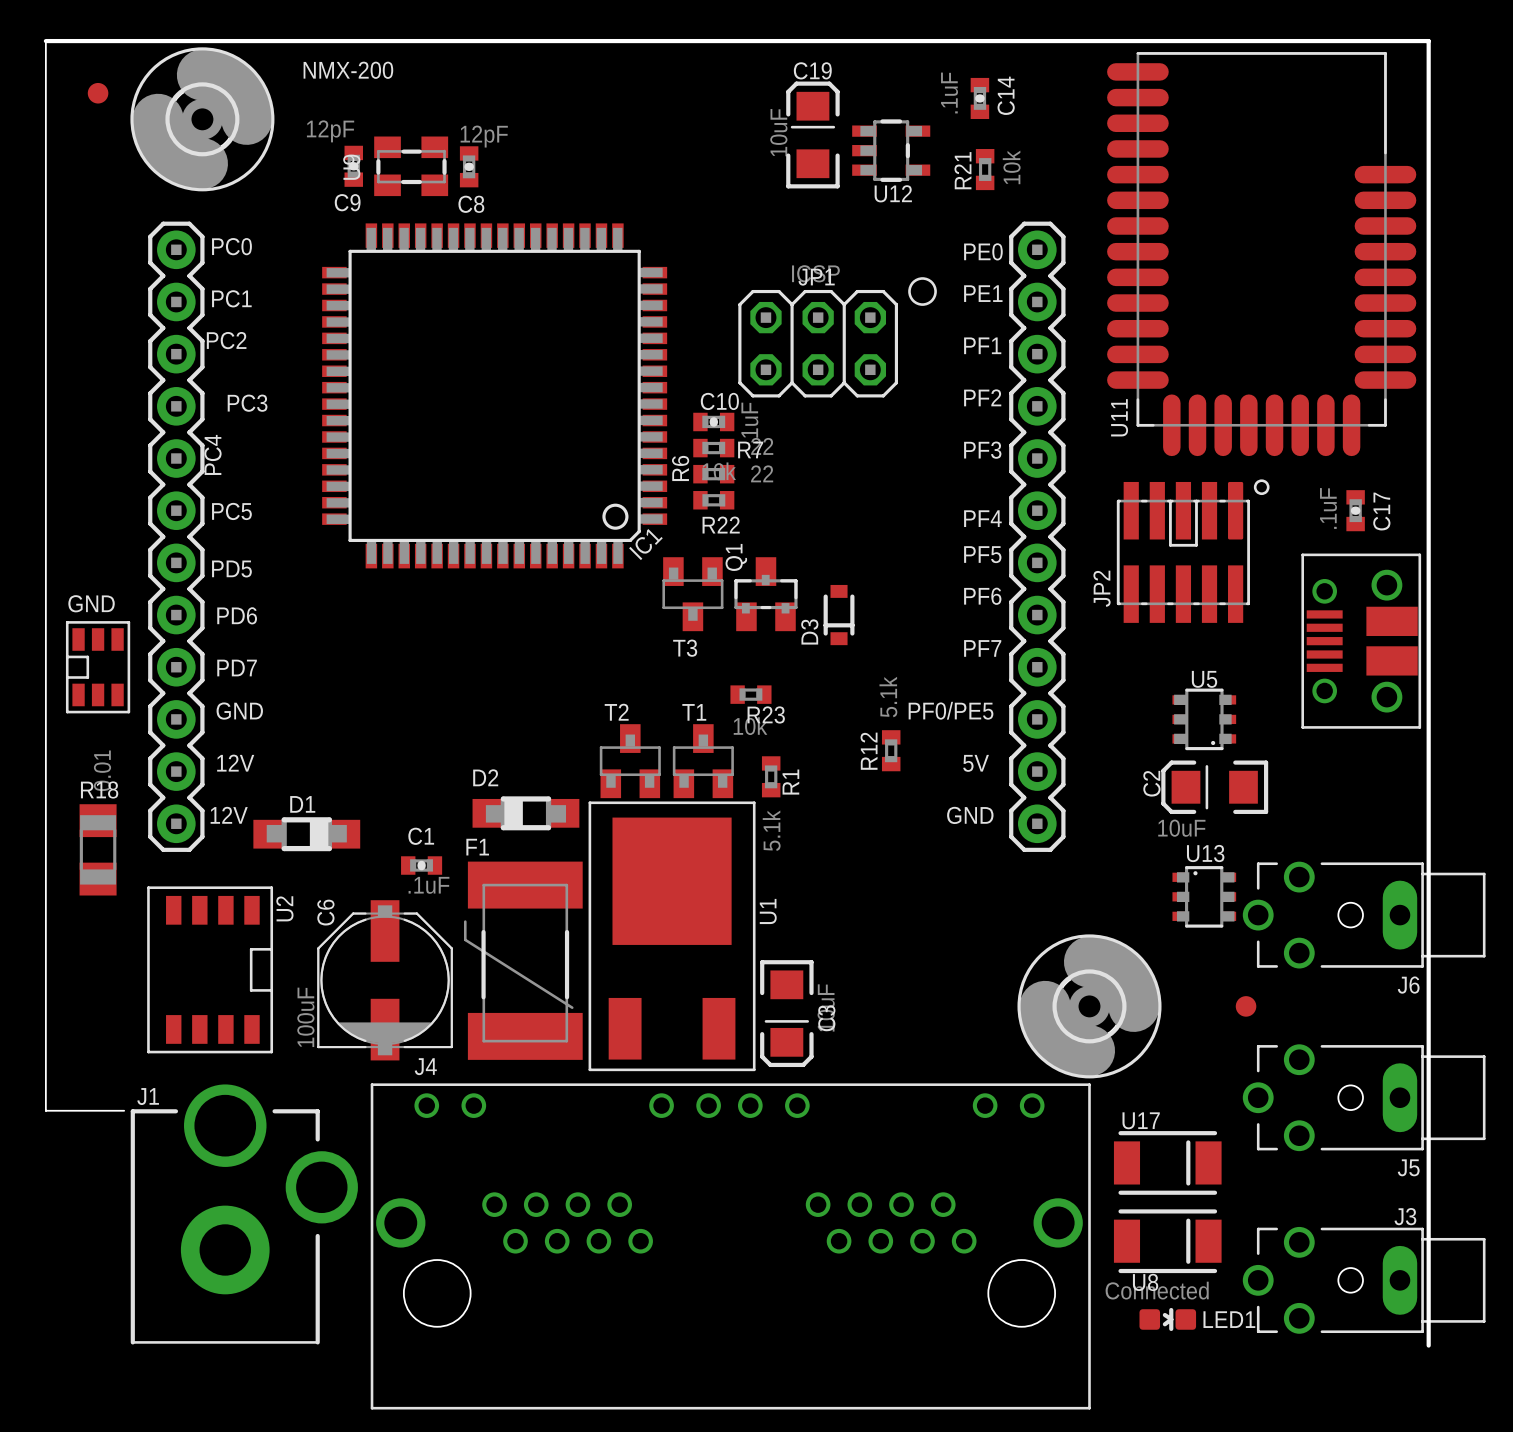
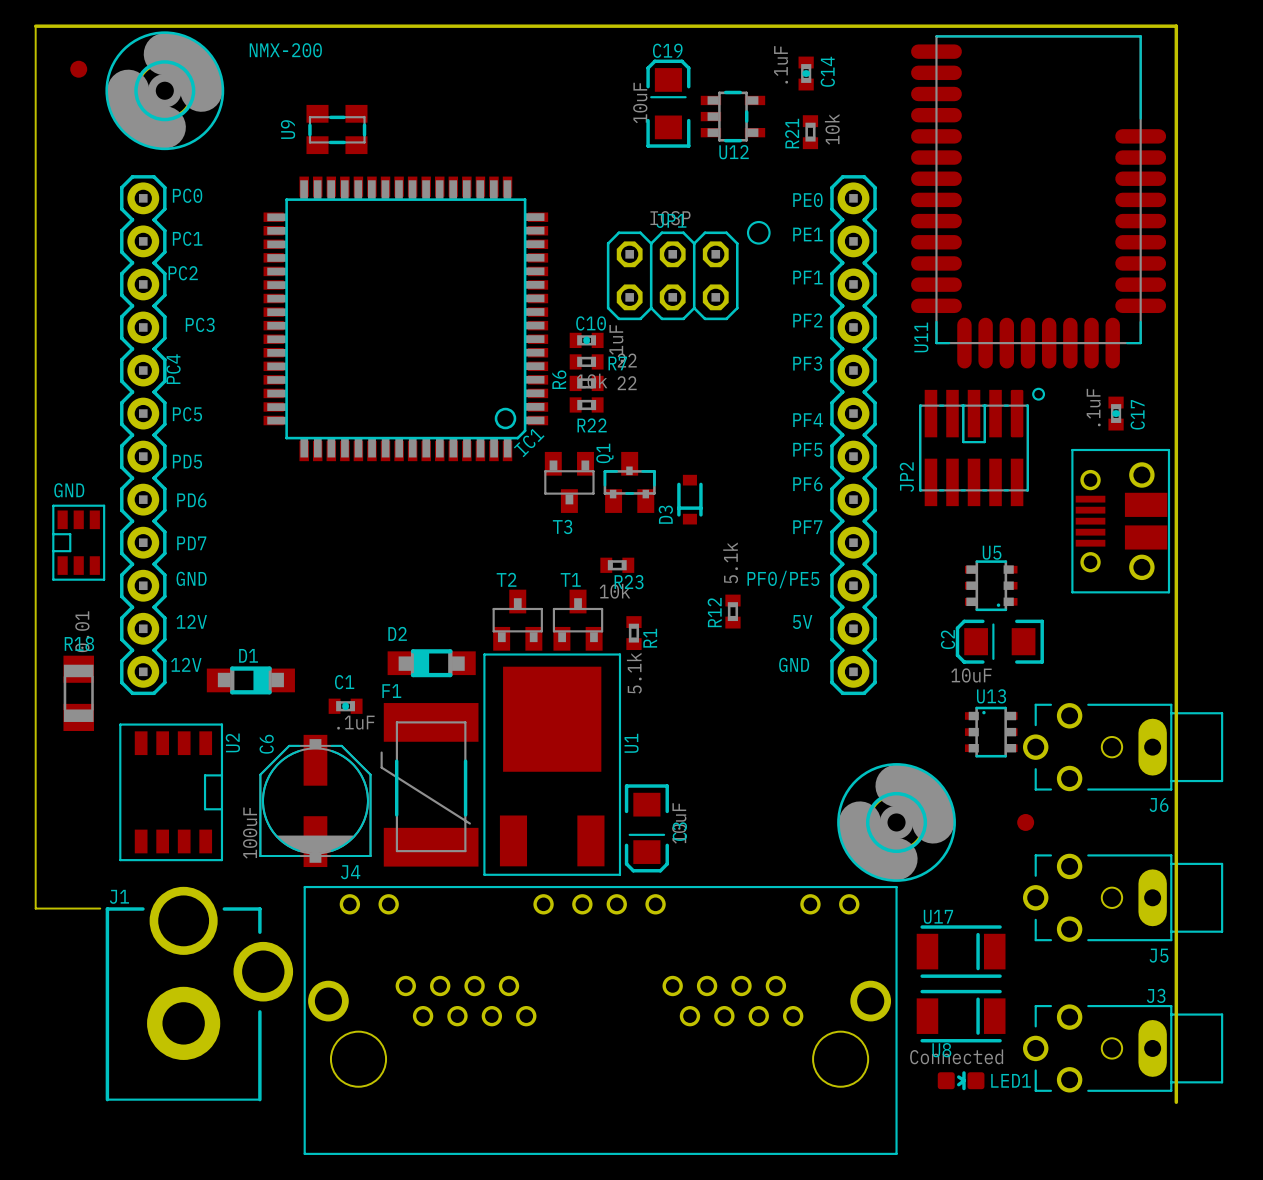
C9: 12pF (353, 166) -> none
C8: 12pF (469, 166) -> none

